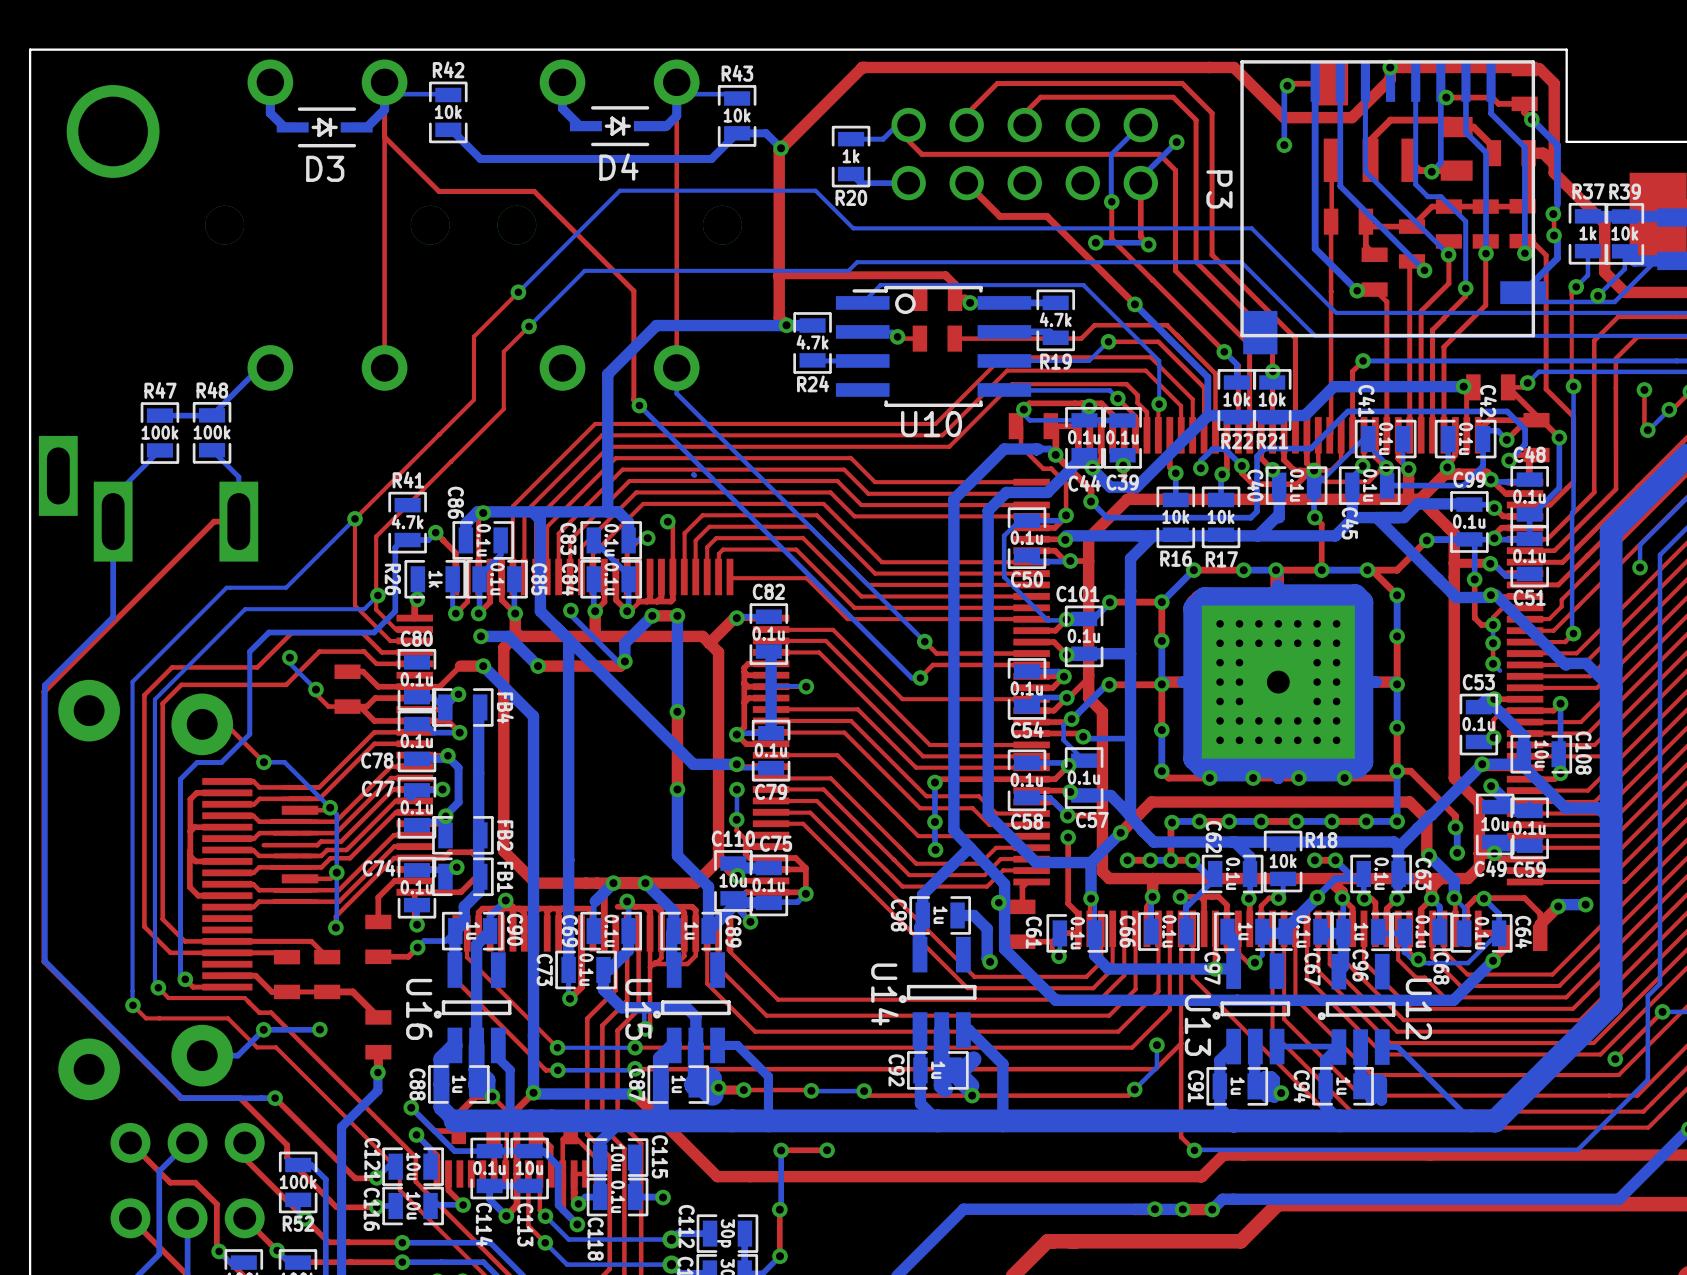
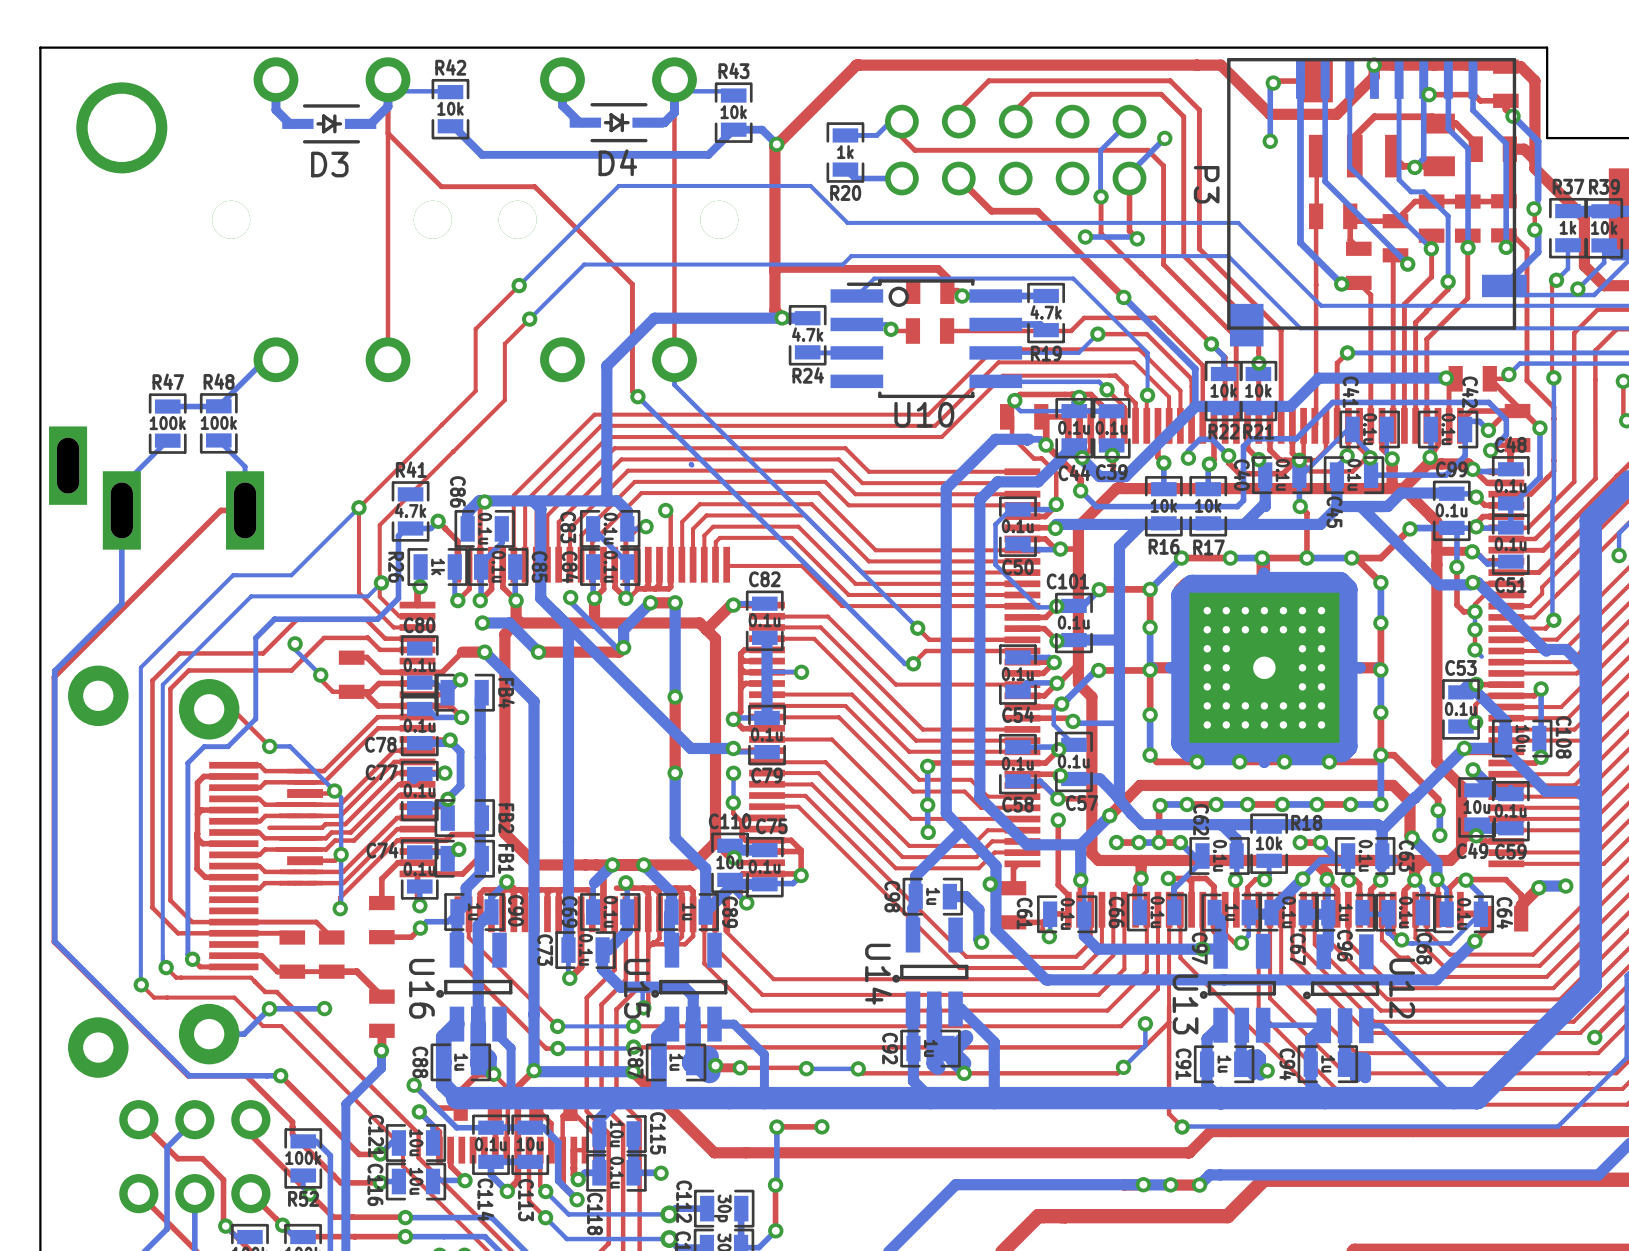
board edge: none -> (68, 448) (68, 482)
board edge: none -> (121, 493) (121, 527)
board edge: none -> (245, 493) (245, 527)

